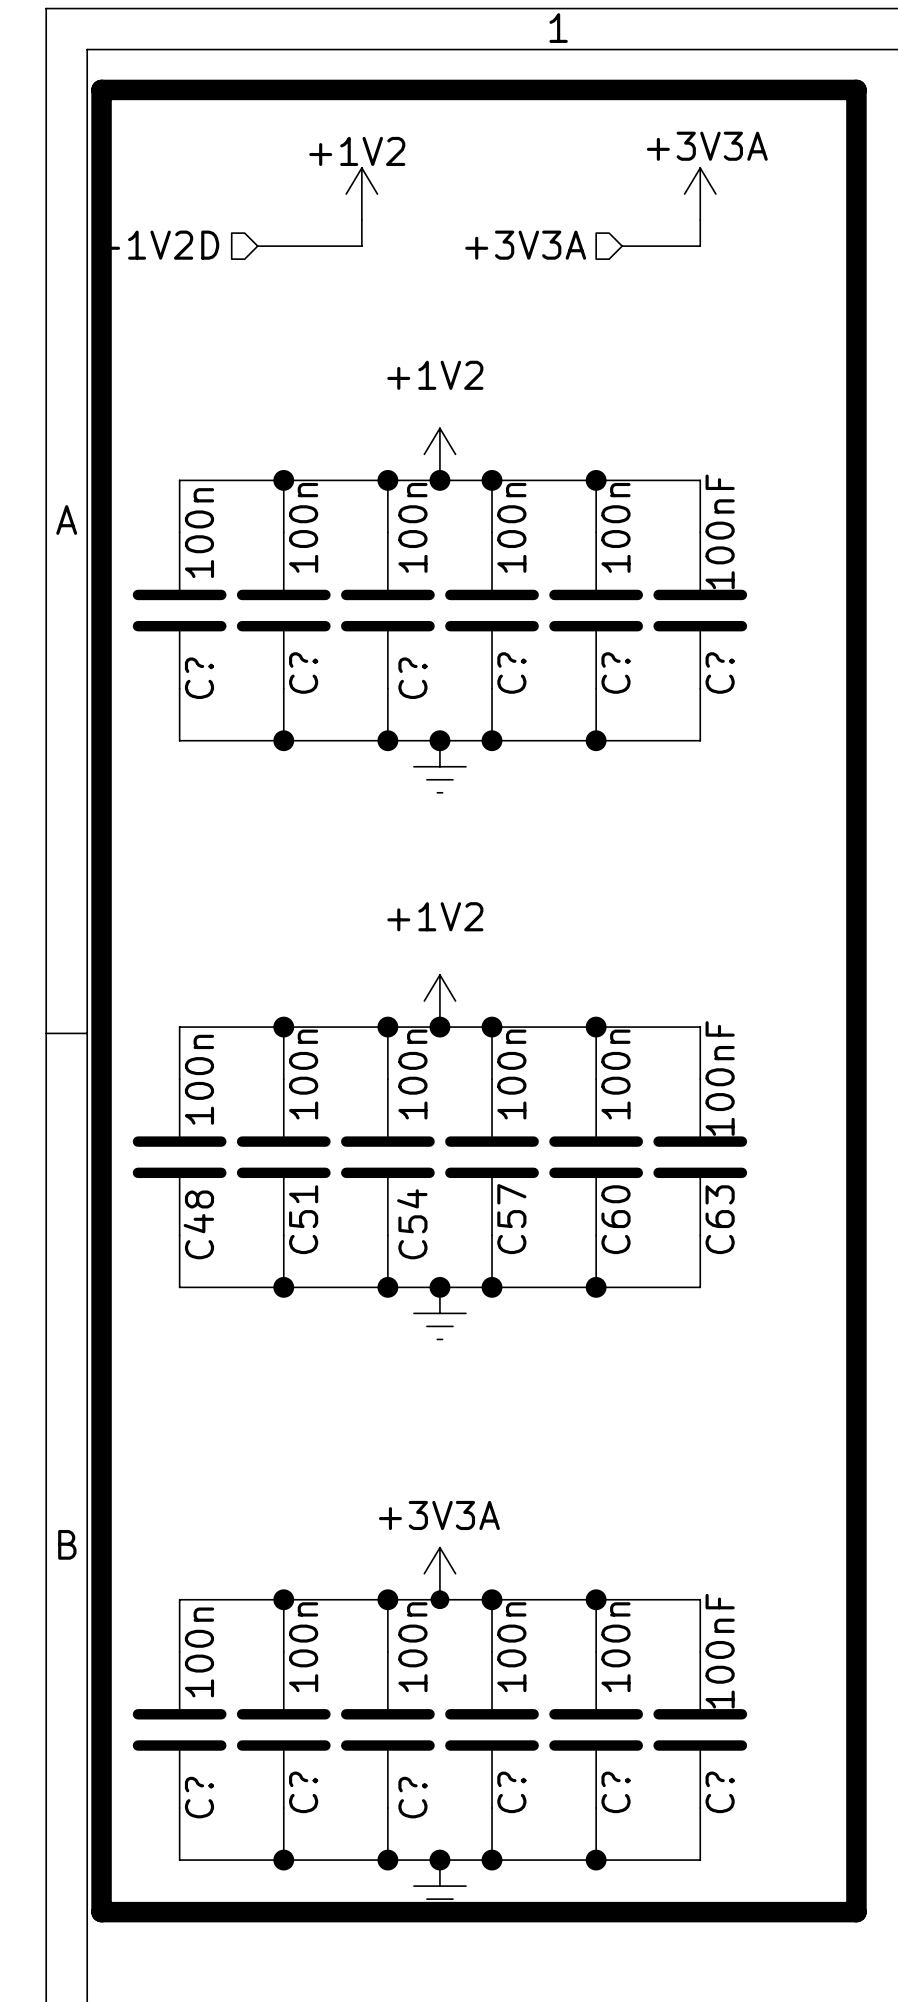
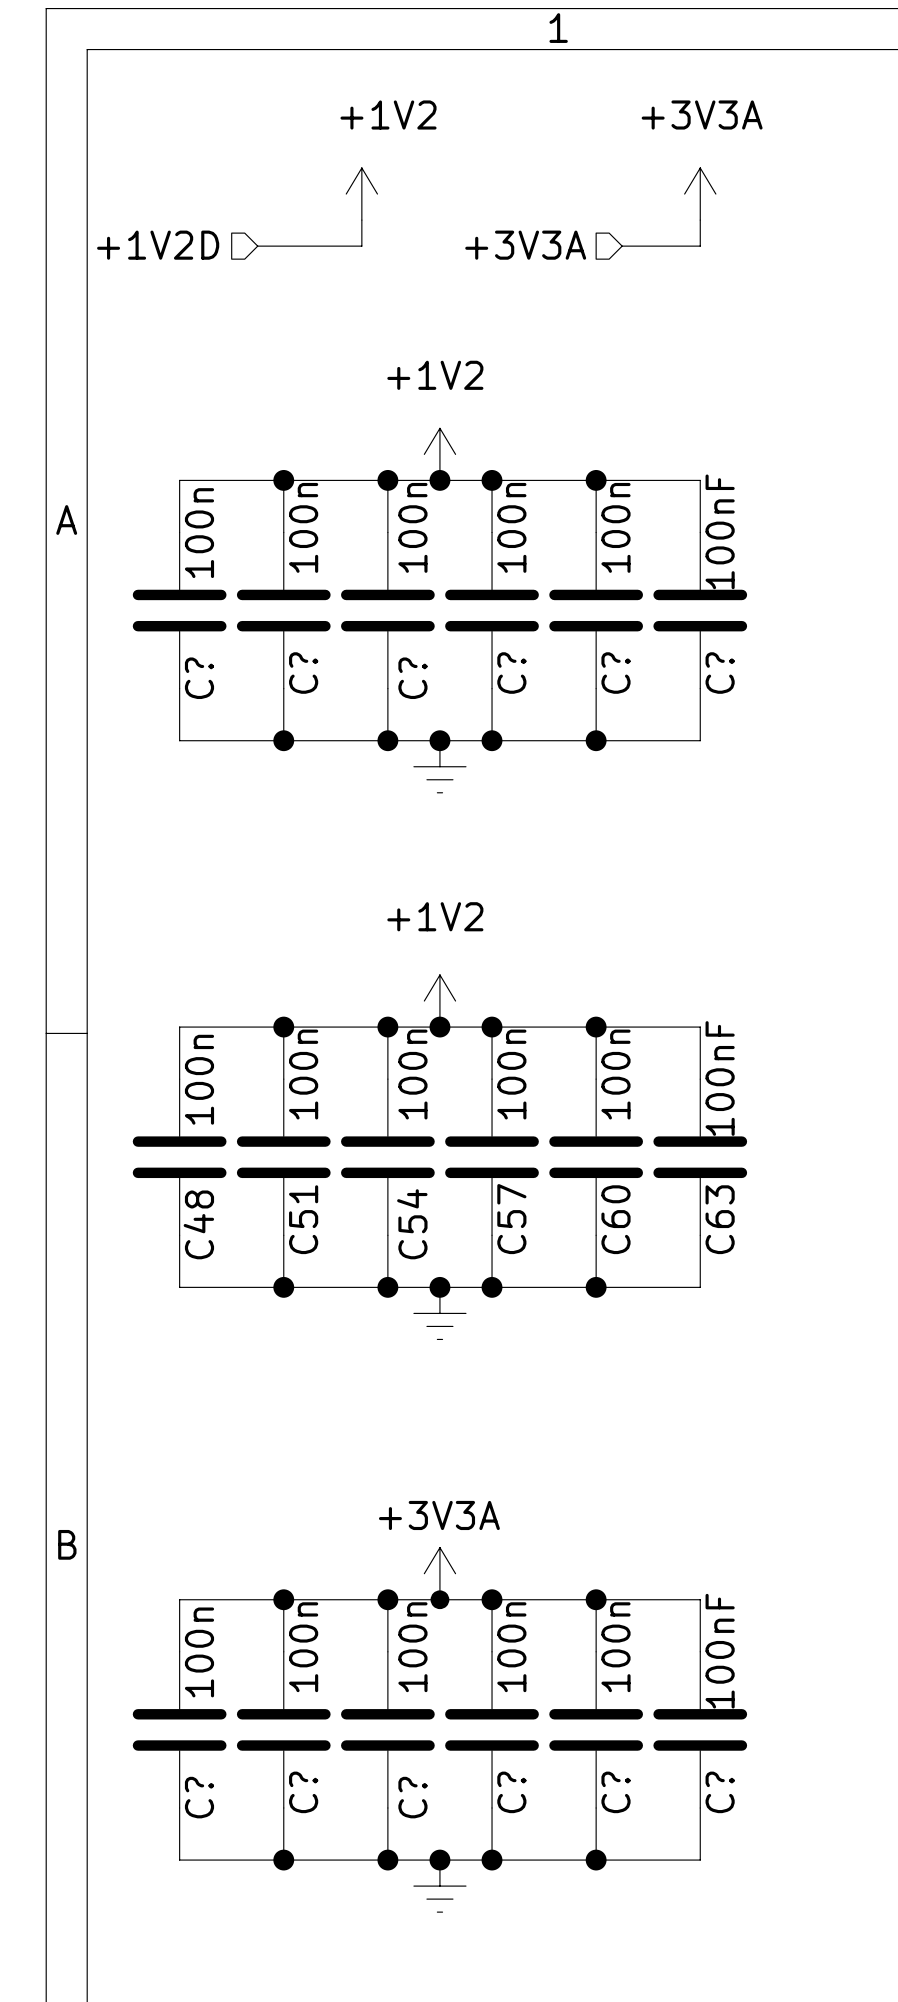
line: (101, 89) (856, 89) (856, 1912) (101, 1912) (101, 89) -> none
power symbol text position: +3V3A (707, 146) -> +3V3A (702, 114)
power symbol text position: +1V2 (357, 151) -> +1V2 (388, 114)

